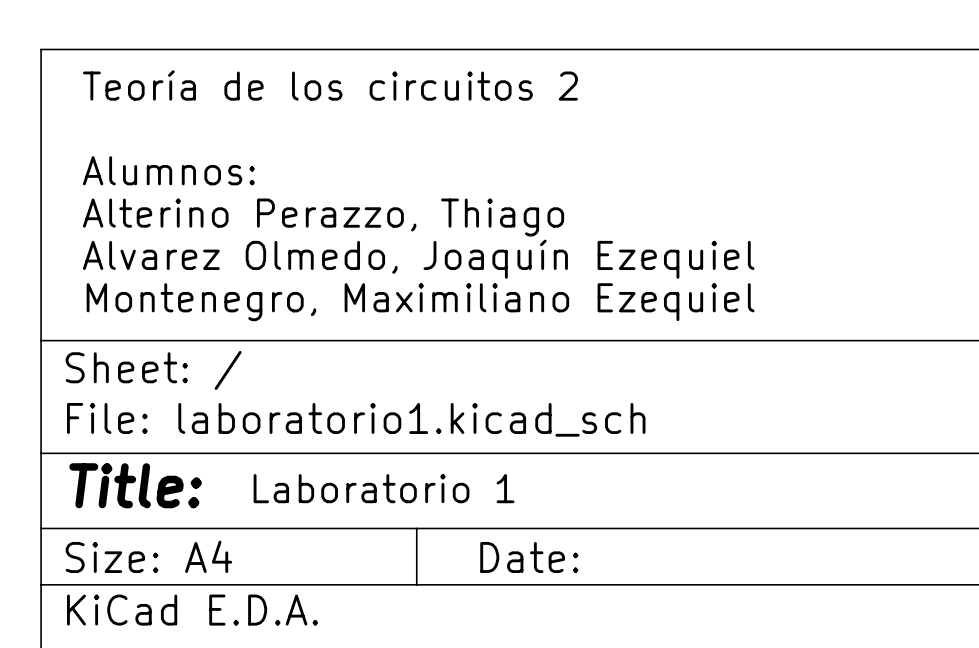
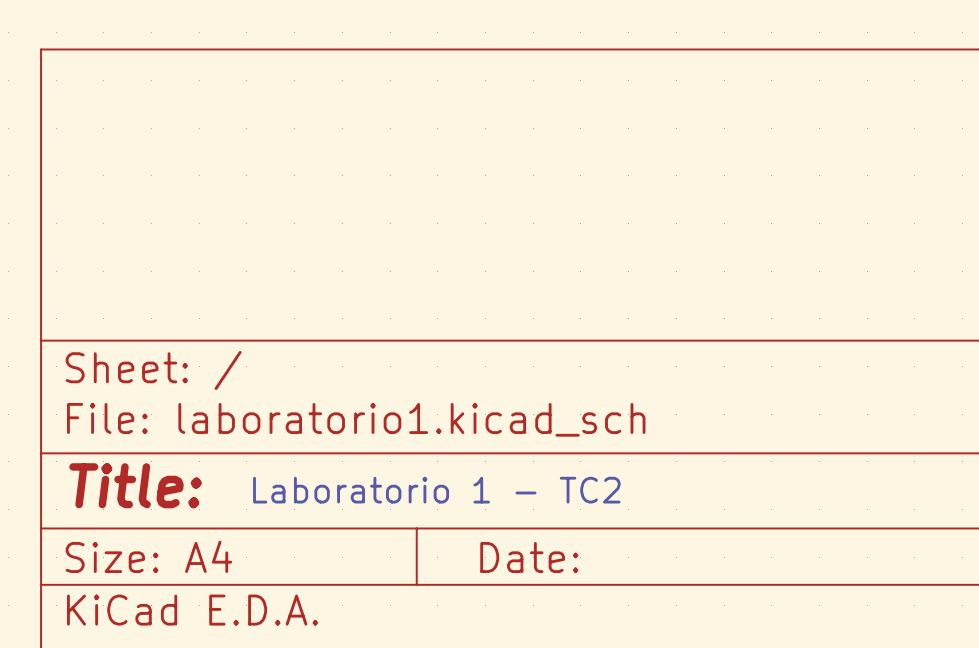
text: Teoría de los circuitos 2 (330, 85) -> none
text: Alumnos: (168, 170) -> none
text: Alterino Perazzo, Thiago (323, 217) -> none
text: Alvarez Olmedo, Joaquín Ezequiel (418, 259) -> none
text: Montenegro, Maximiliano Ezequiel (420, 302) -> none
text: Laboratorio 1 (384, 488) -> Laboratorio 1 - TC2 (436, 490)

